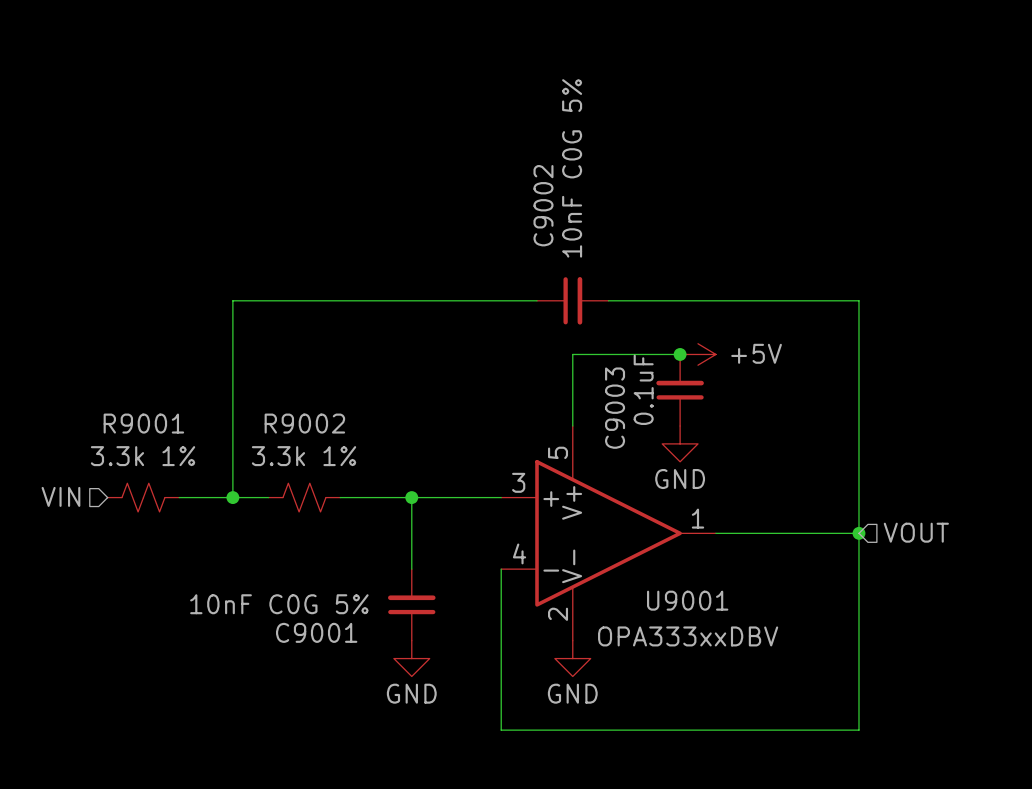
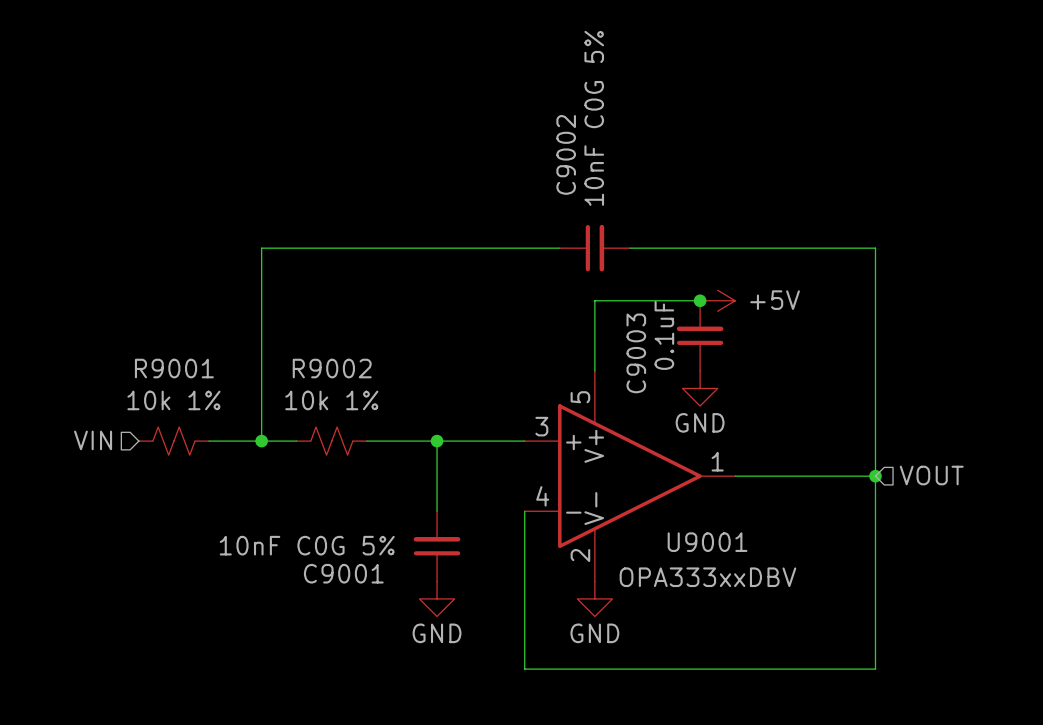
R9001 value: 3.3k 1% (143, 456) -> 10k 1% (173, 400)
R9002 value: 3.3k 1% (304, 456) -> 10k 1% (331, 400)

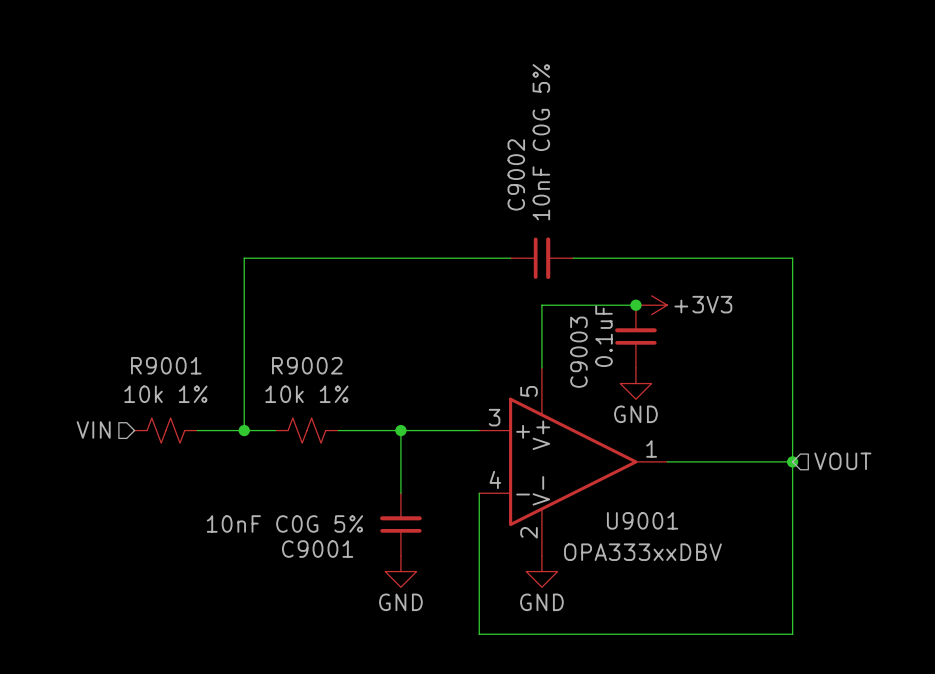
power symbol: +5V (717, 300) -> +3V3 (651, 305)

